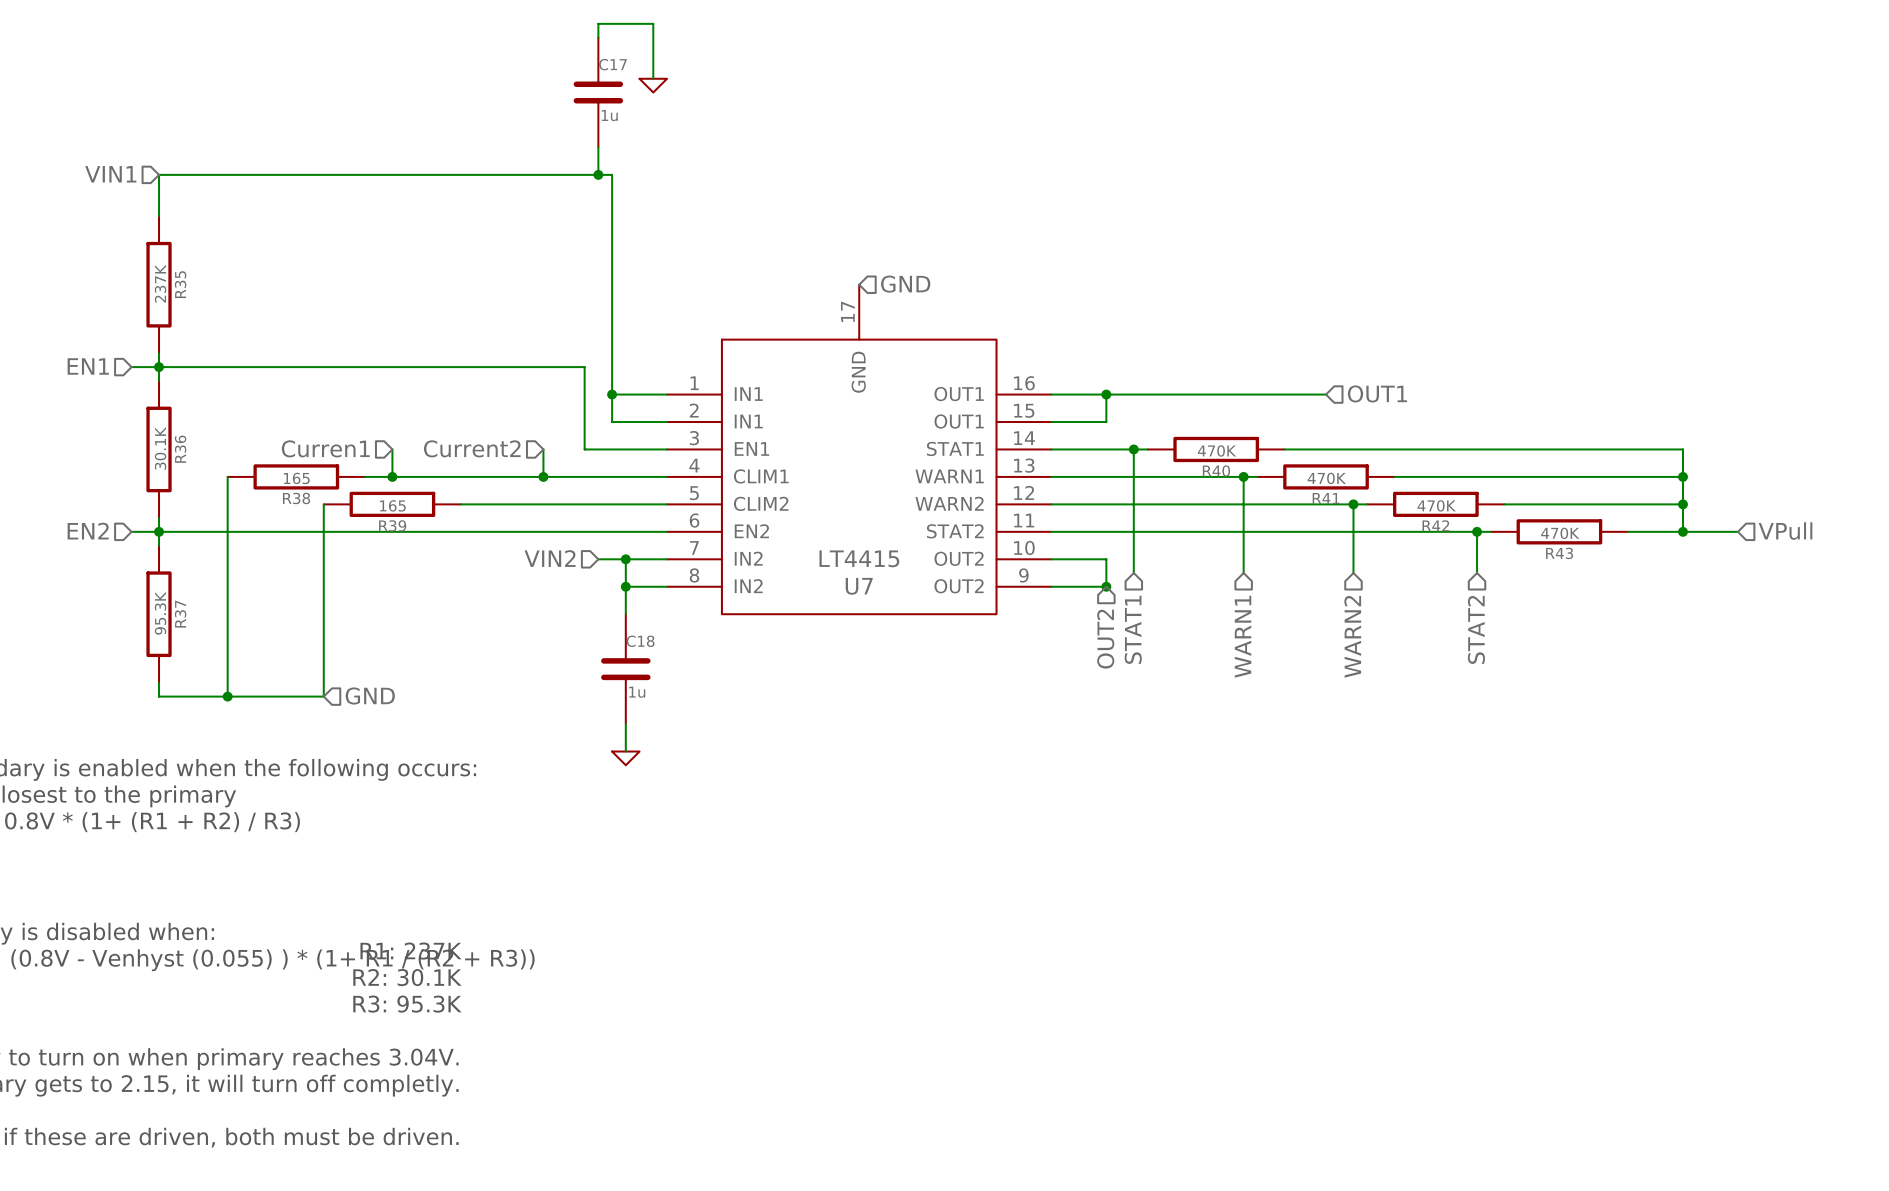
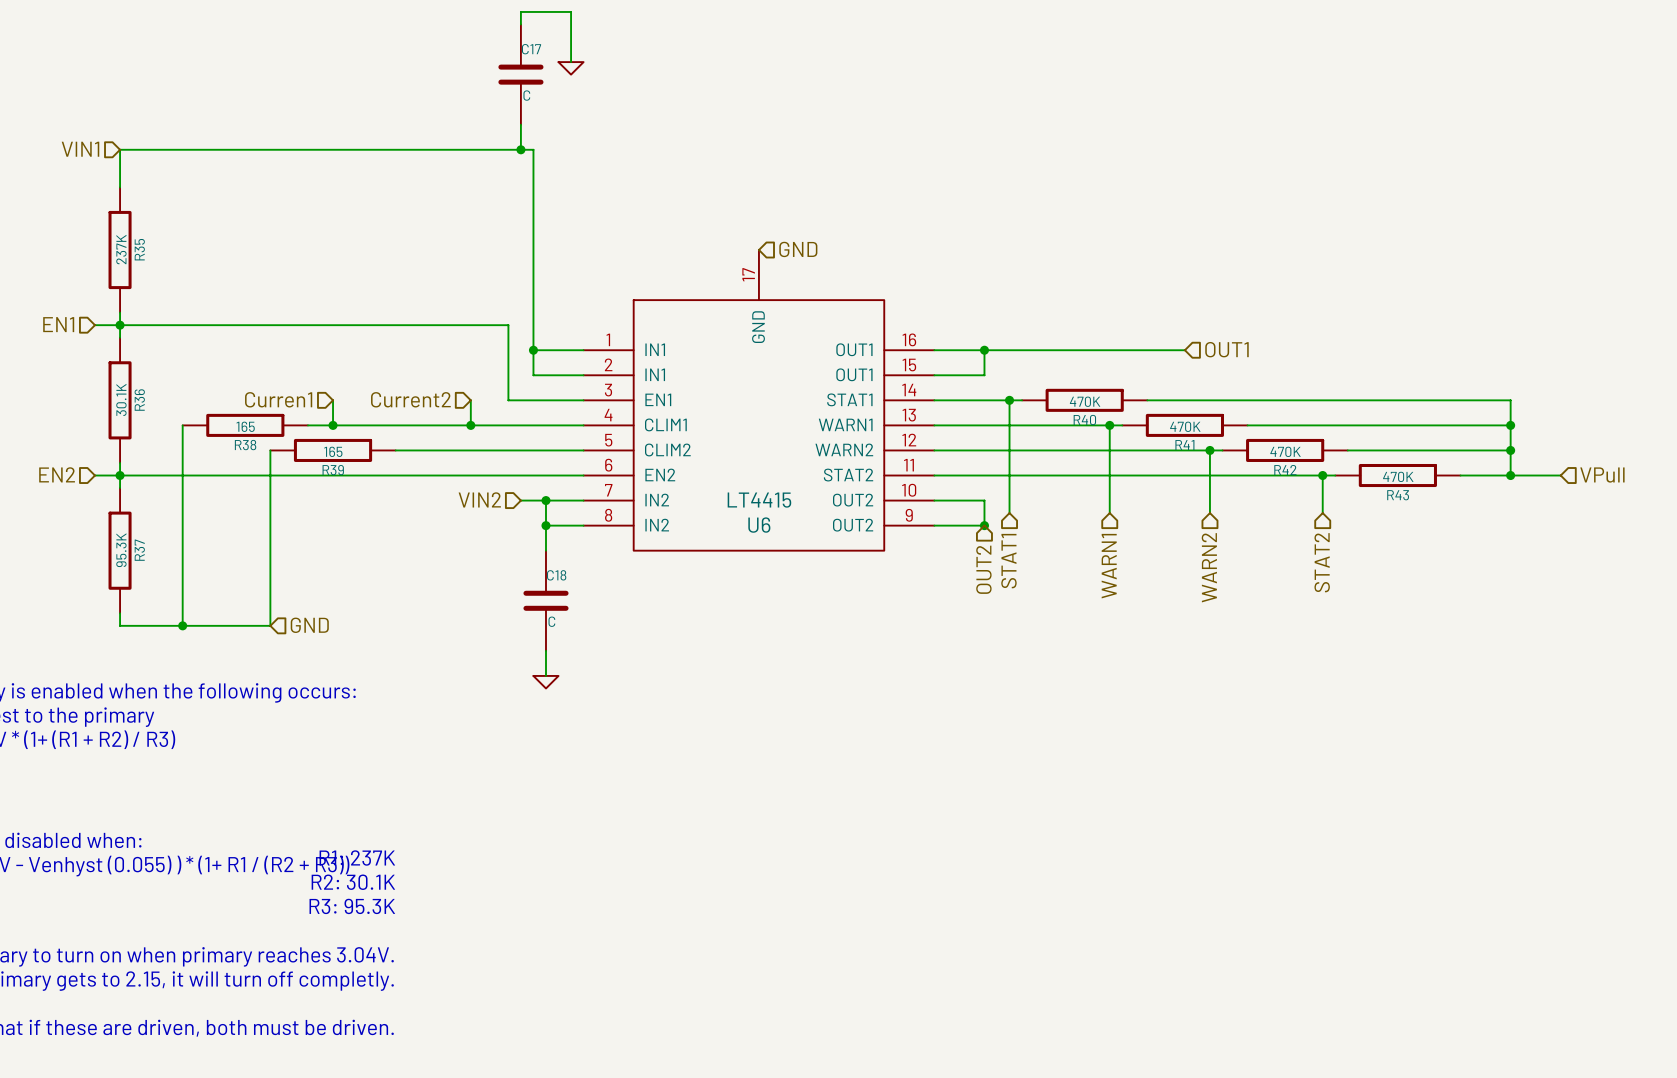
C17 value: 1u (609, 115) -> C (526, 95)
U7 name: U7 (859, 586) -> U6 (759, 525)
C18 value: 1u (637, 692) -> C (551, 621)

